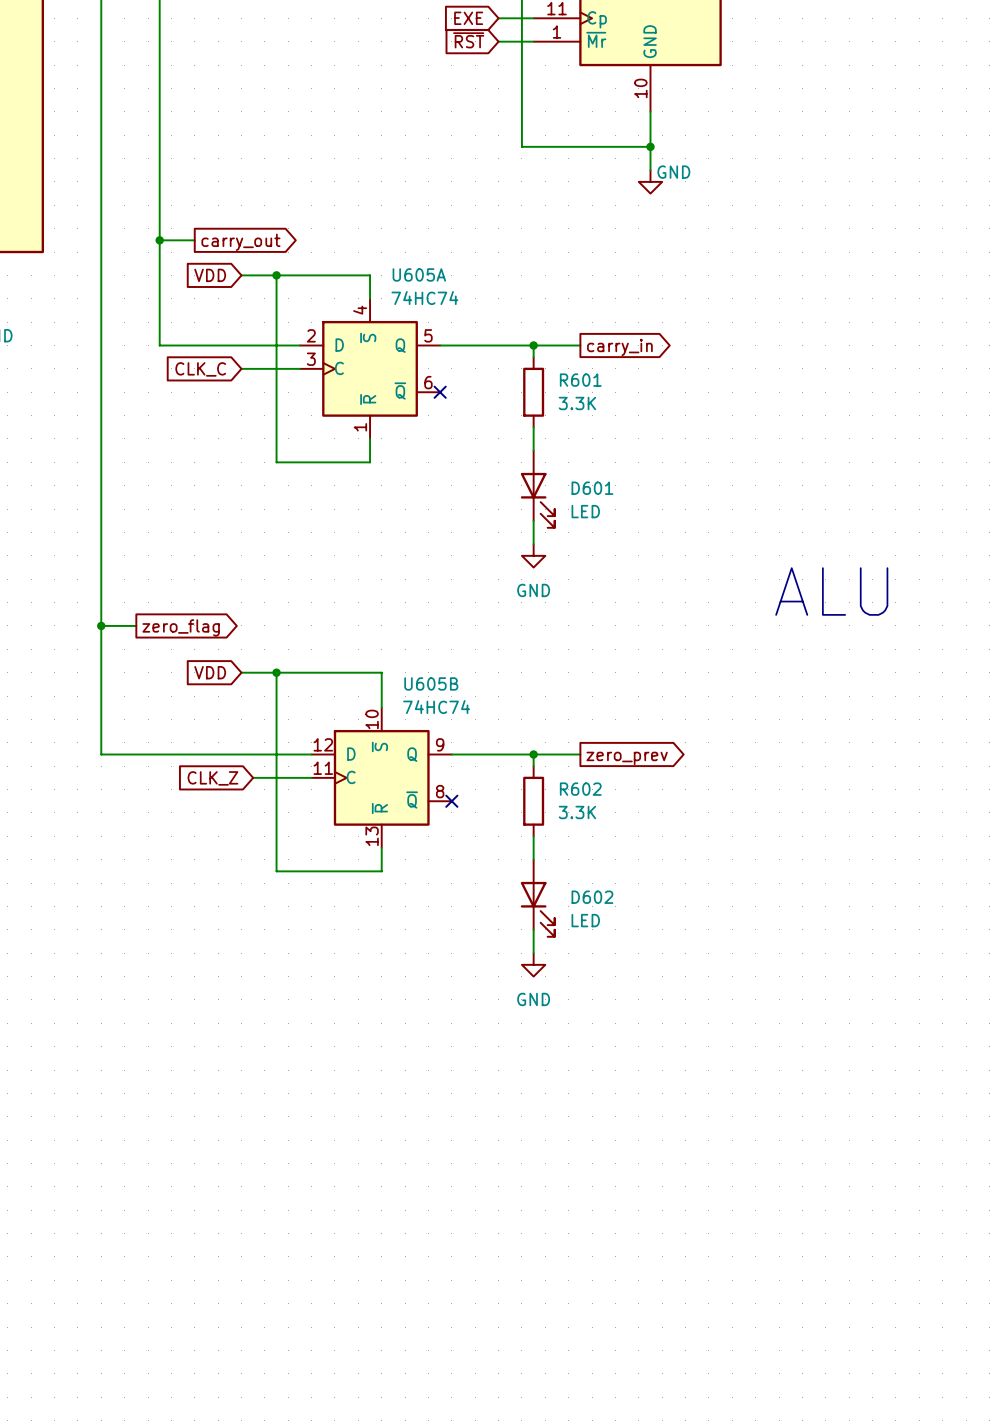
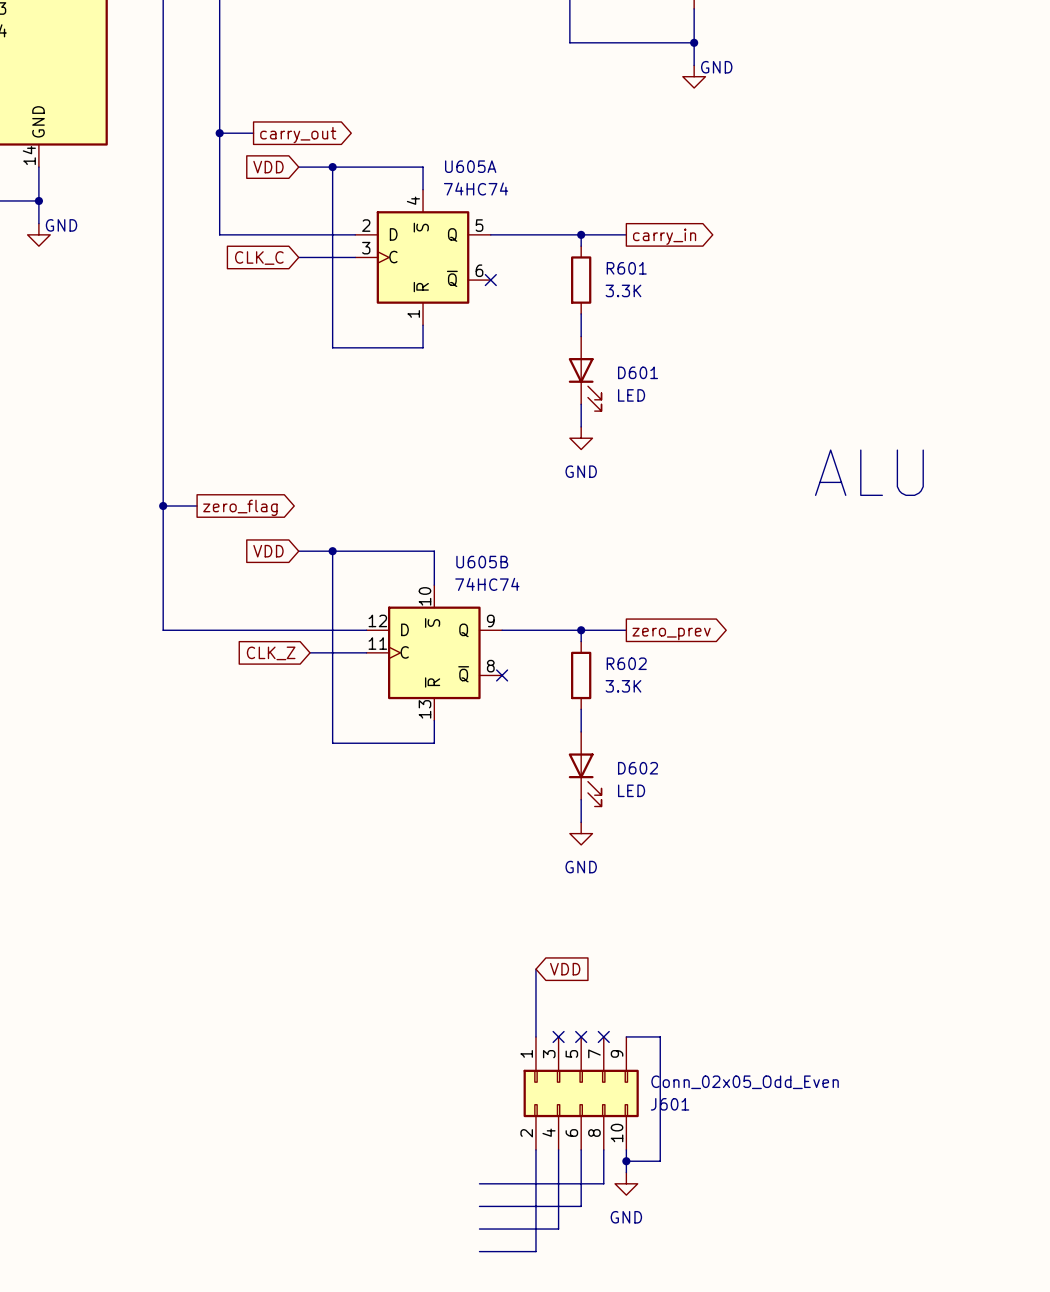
wire: none -> (535, 969) (535, 1036)
global label: none -> VDD (565, 969)
no-connect mark: none -> (558, 1036)
no-connect mark: none -> (581, 1036)
no-connect mark: none -> (603, 1036)
wire: none -> (626, 1036) (660, 1036) (660, 1161) (626, 1161)
J601: none -> Conn_02x05_Odd_Even (581, 1093)
wire: none -> (535, 1149) (535, 1251) (479, 1251)
wire: none -> (558, 1149) (558, 1229) (479, 1229)
wire: none -> (581, 1149) (581, 1206) (479, 1206)
wire: none -> (603, 1149) (603, 1183) (479, 1183)
wire: none -> (626, 1149) (626, 1172)
junction: none -> (626, 1161)
power symbol: none -> GND (626, 1183)

